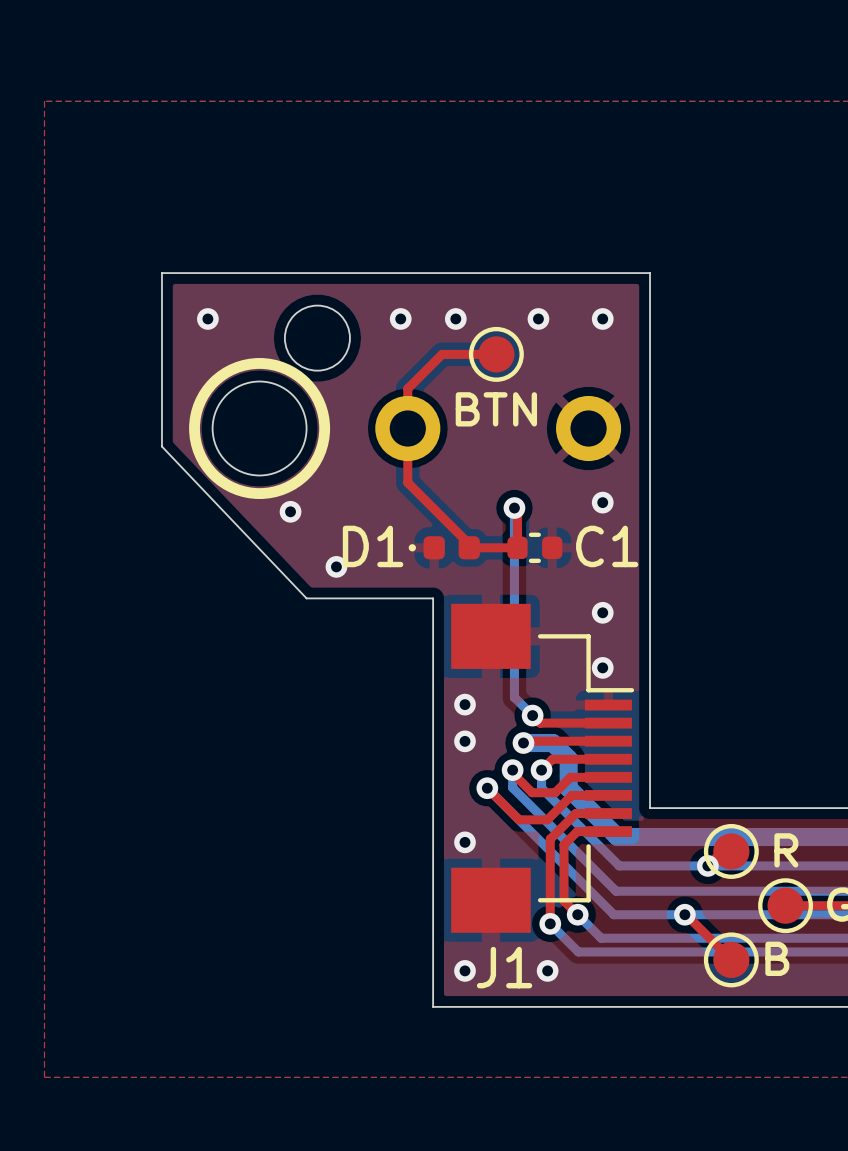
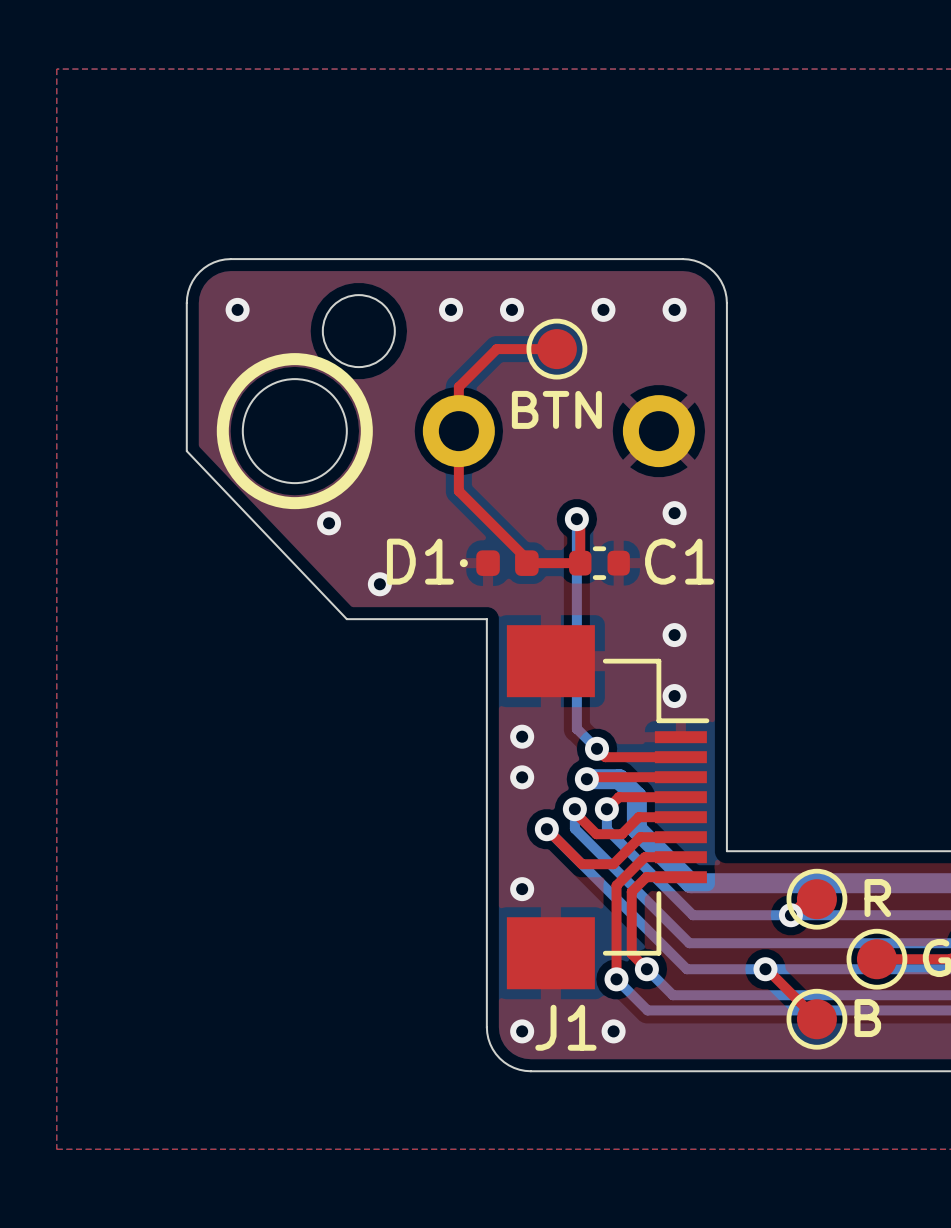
board edge: (201, 273) (161, 273) (161, 312) -> (230, 259) (213, 262) (199, 271) (190, 286) (186, 303)
board edge: (610, 273) (650, 273) (650, 312) -> (682, 259) (699, 262) (714, 271) (723, 286) (726, 303)
board edge: (433, 967) (433, 1006) (472, 1006) -> (486, 1027) (490, 1044) (499, 1058) (514, 1067) (530, 1071)

